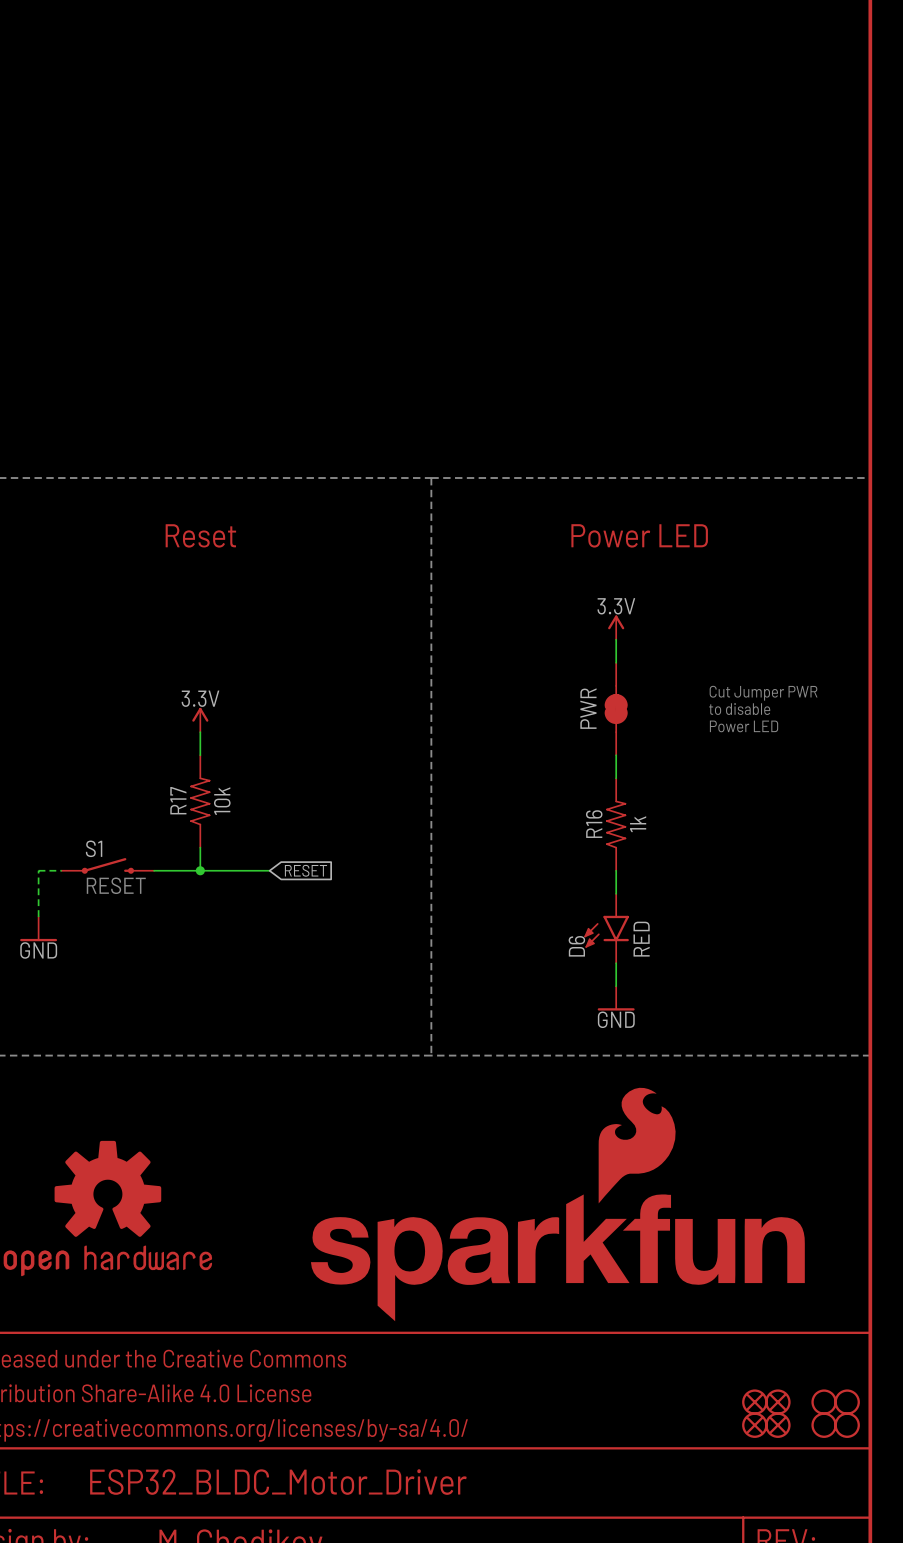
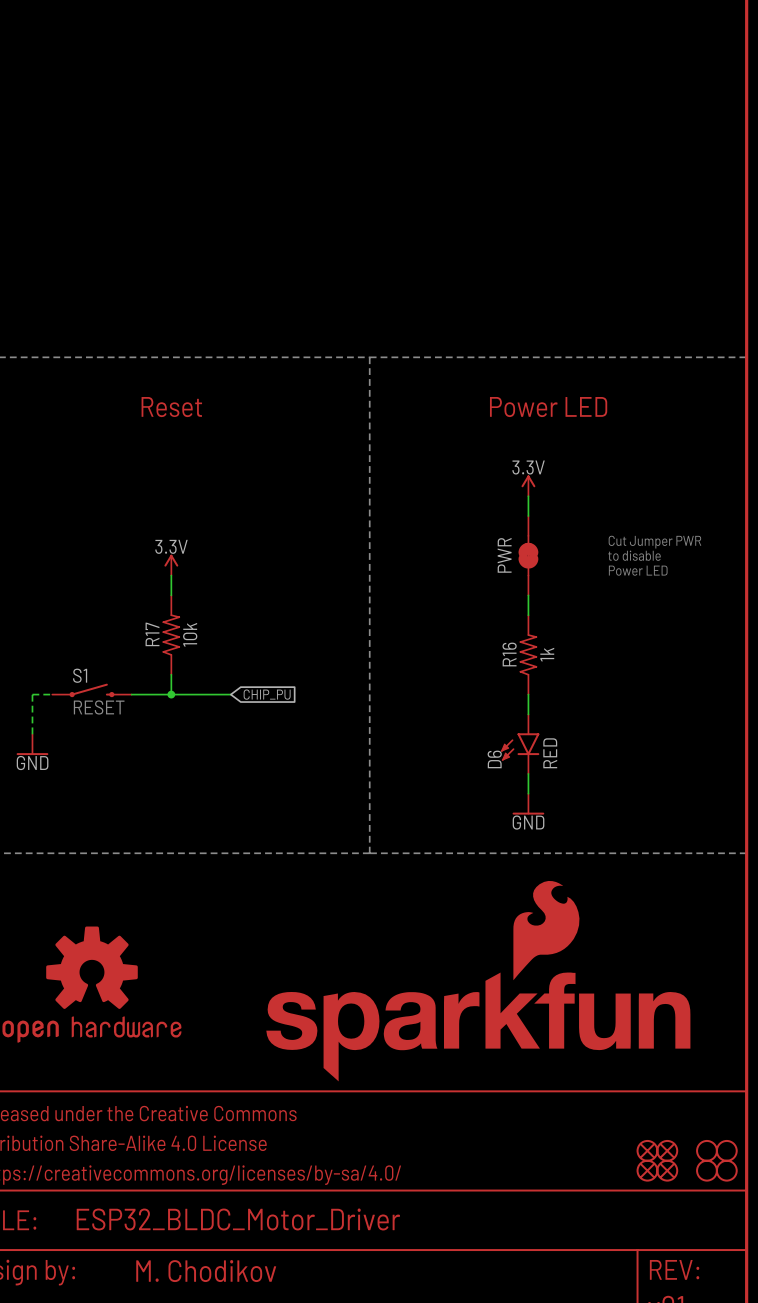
global label: RESET (305, 870) -> CHIP_PU (267, 694)

